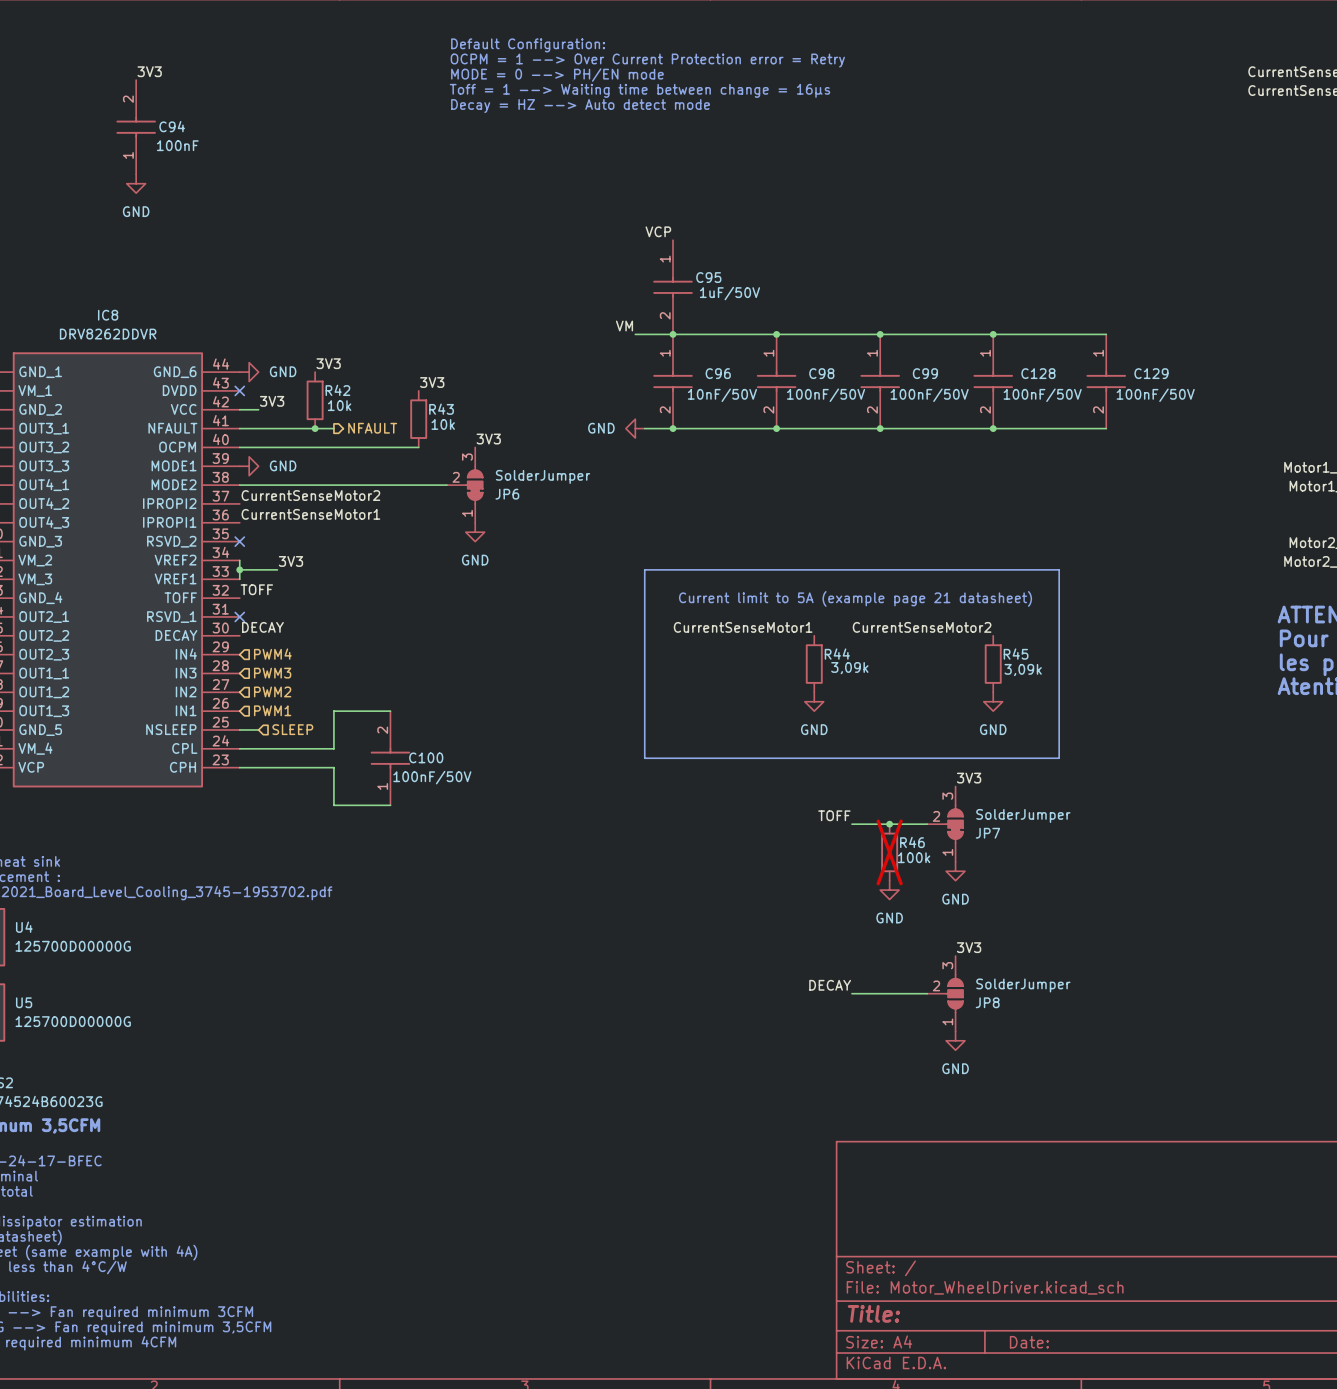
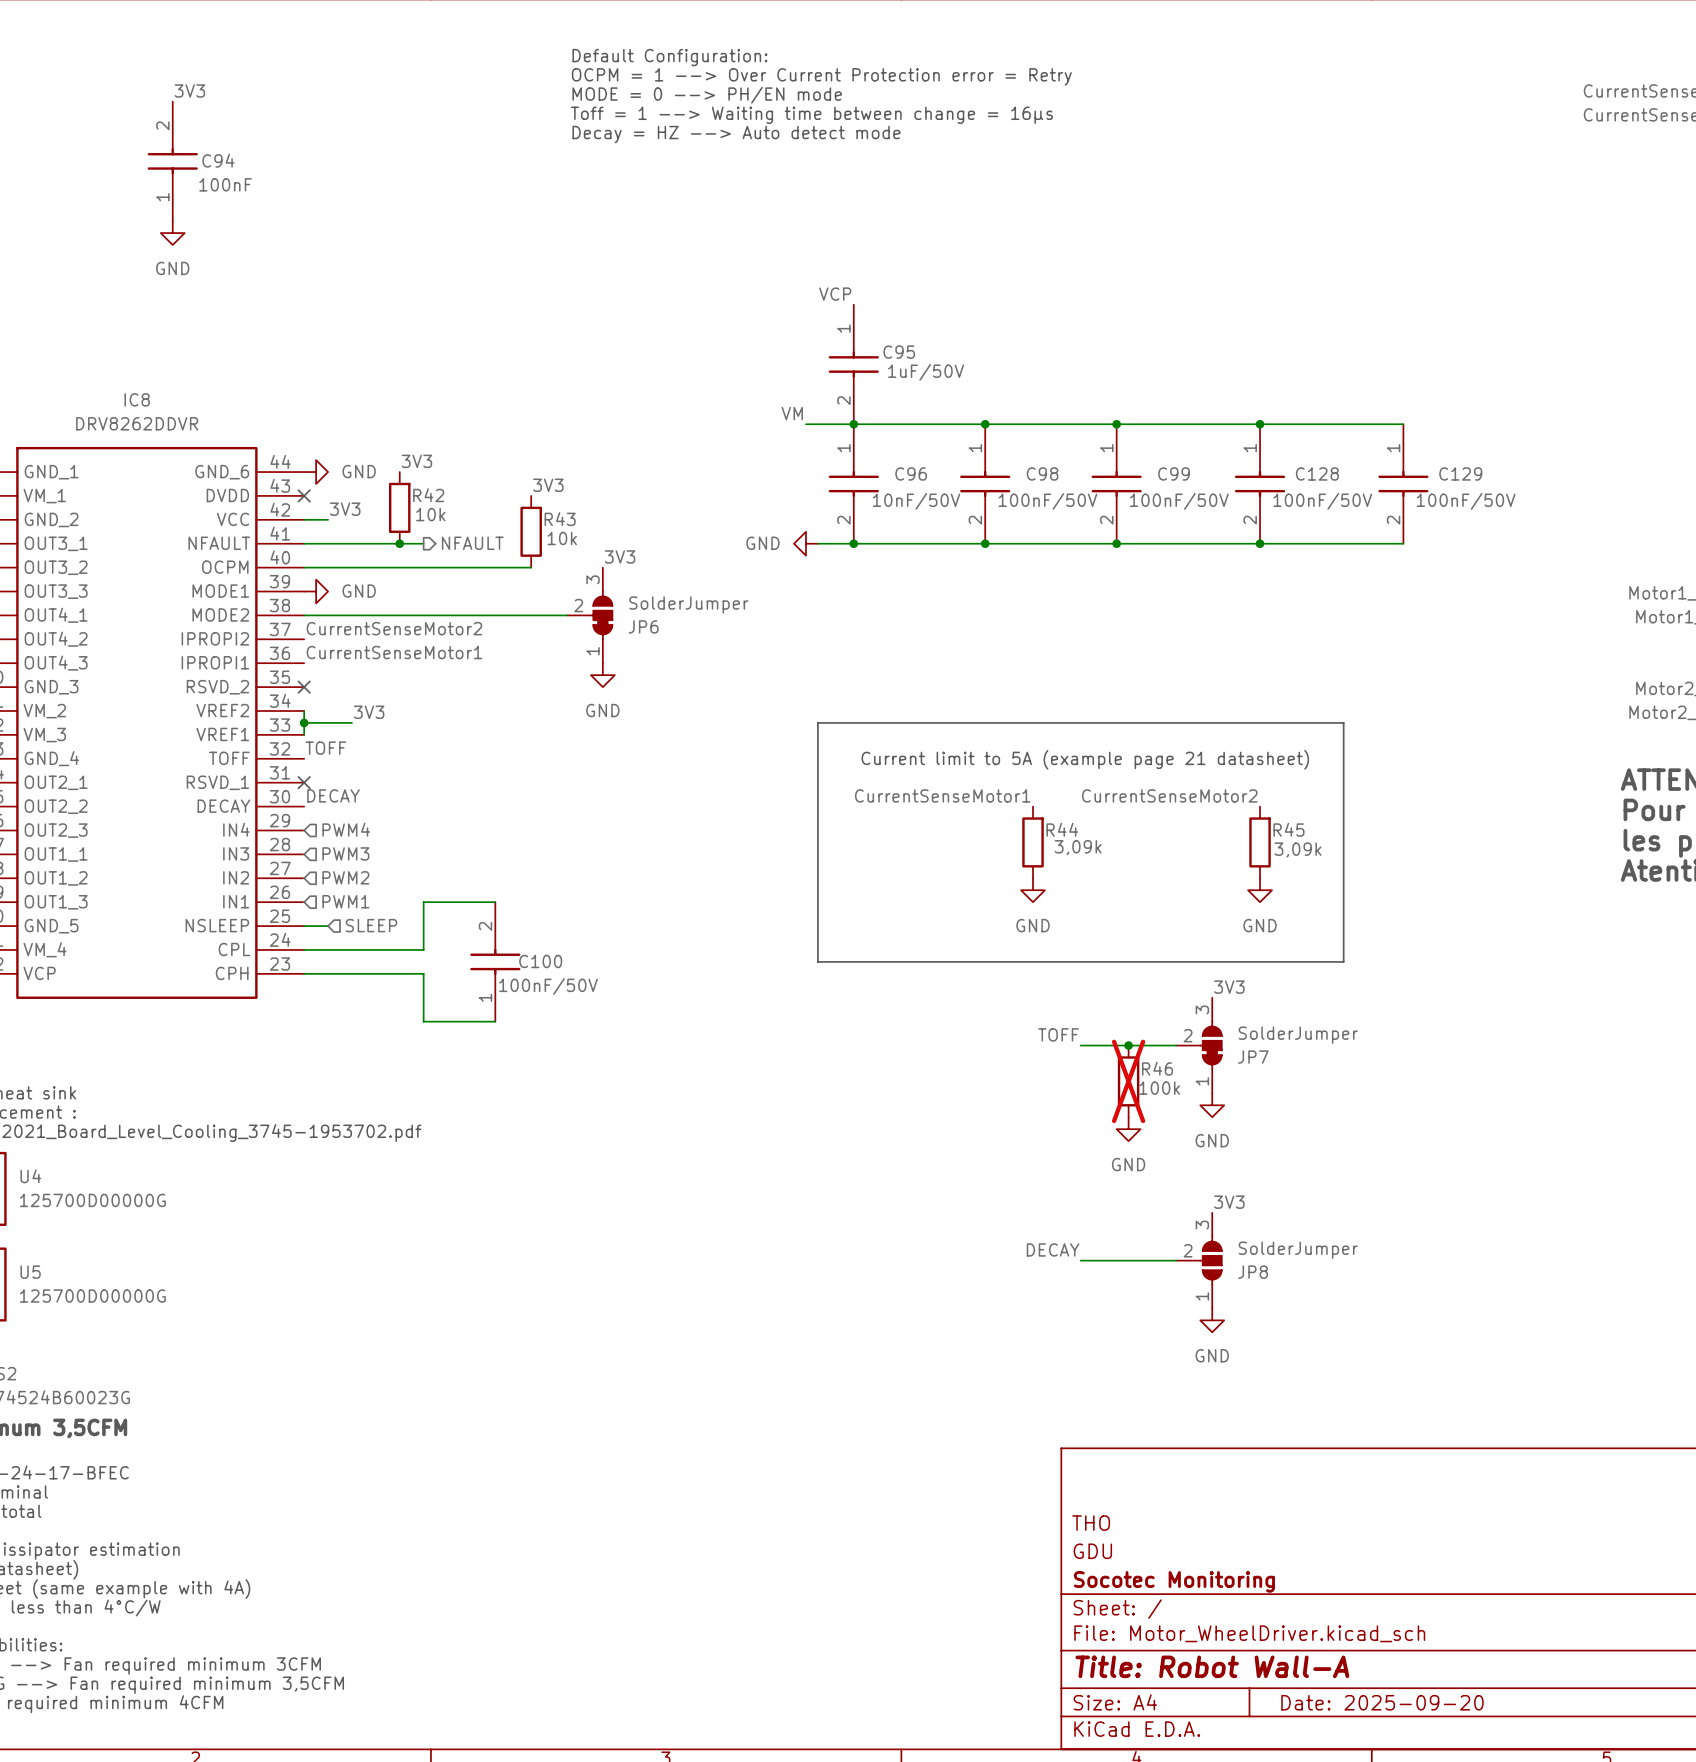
title block: none -> THO (1091, 1523)
title block: none -> GDU (1092, 1551)
title block: none -> Socotec Monitoring (1174, 1581)
title block: Title: (873, 1313) -> Title: Robot Wall-A (1212, 1666)
title block: Date: (1029, 1342) -> Date: 2025-09-20 (1382, 1702)

